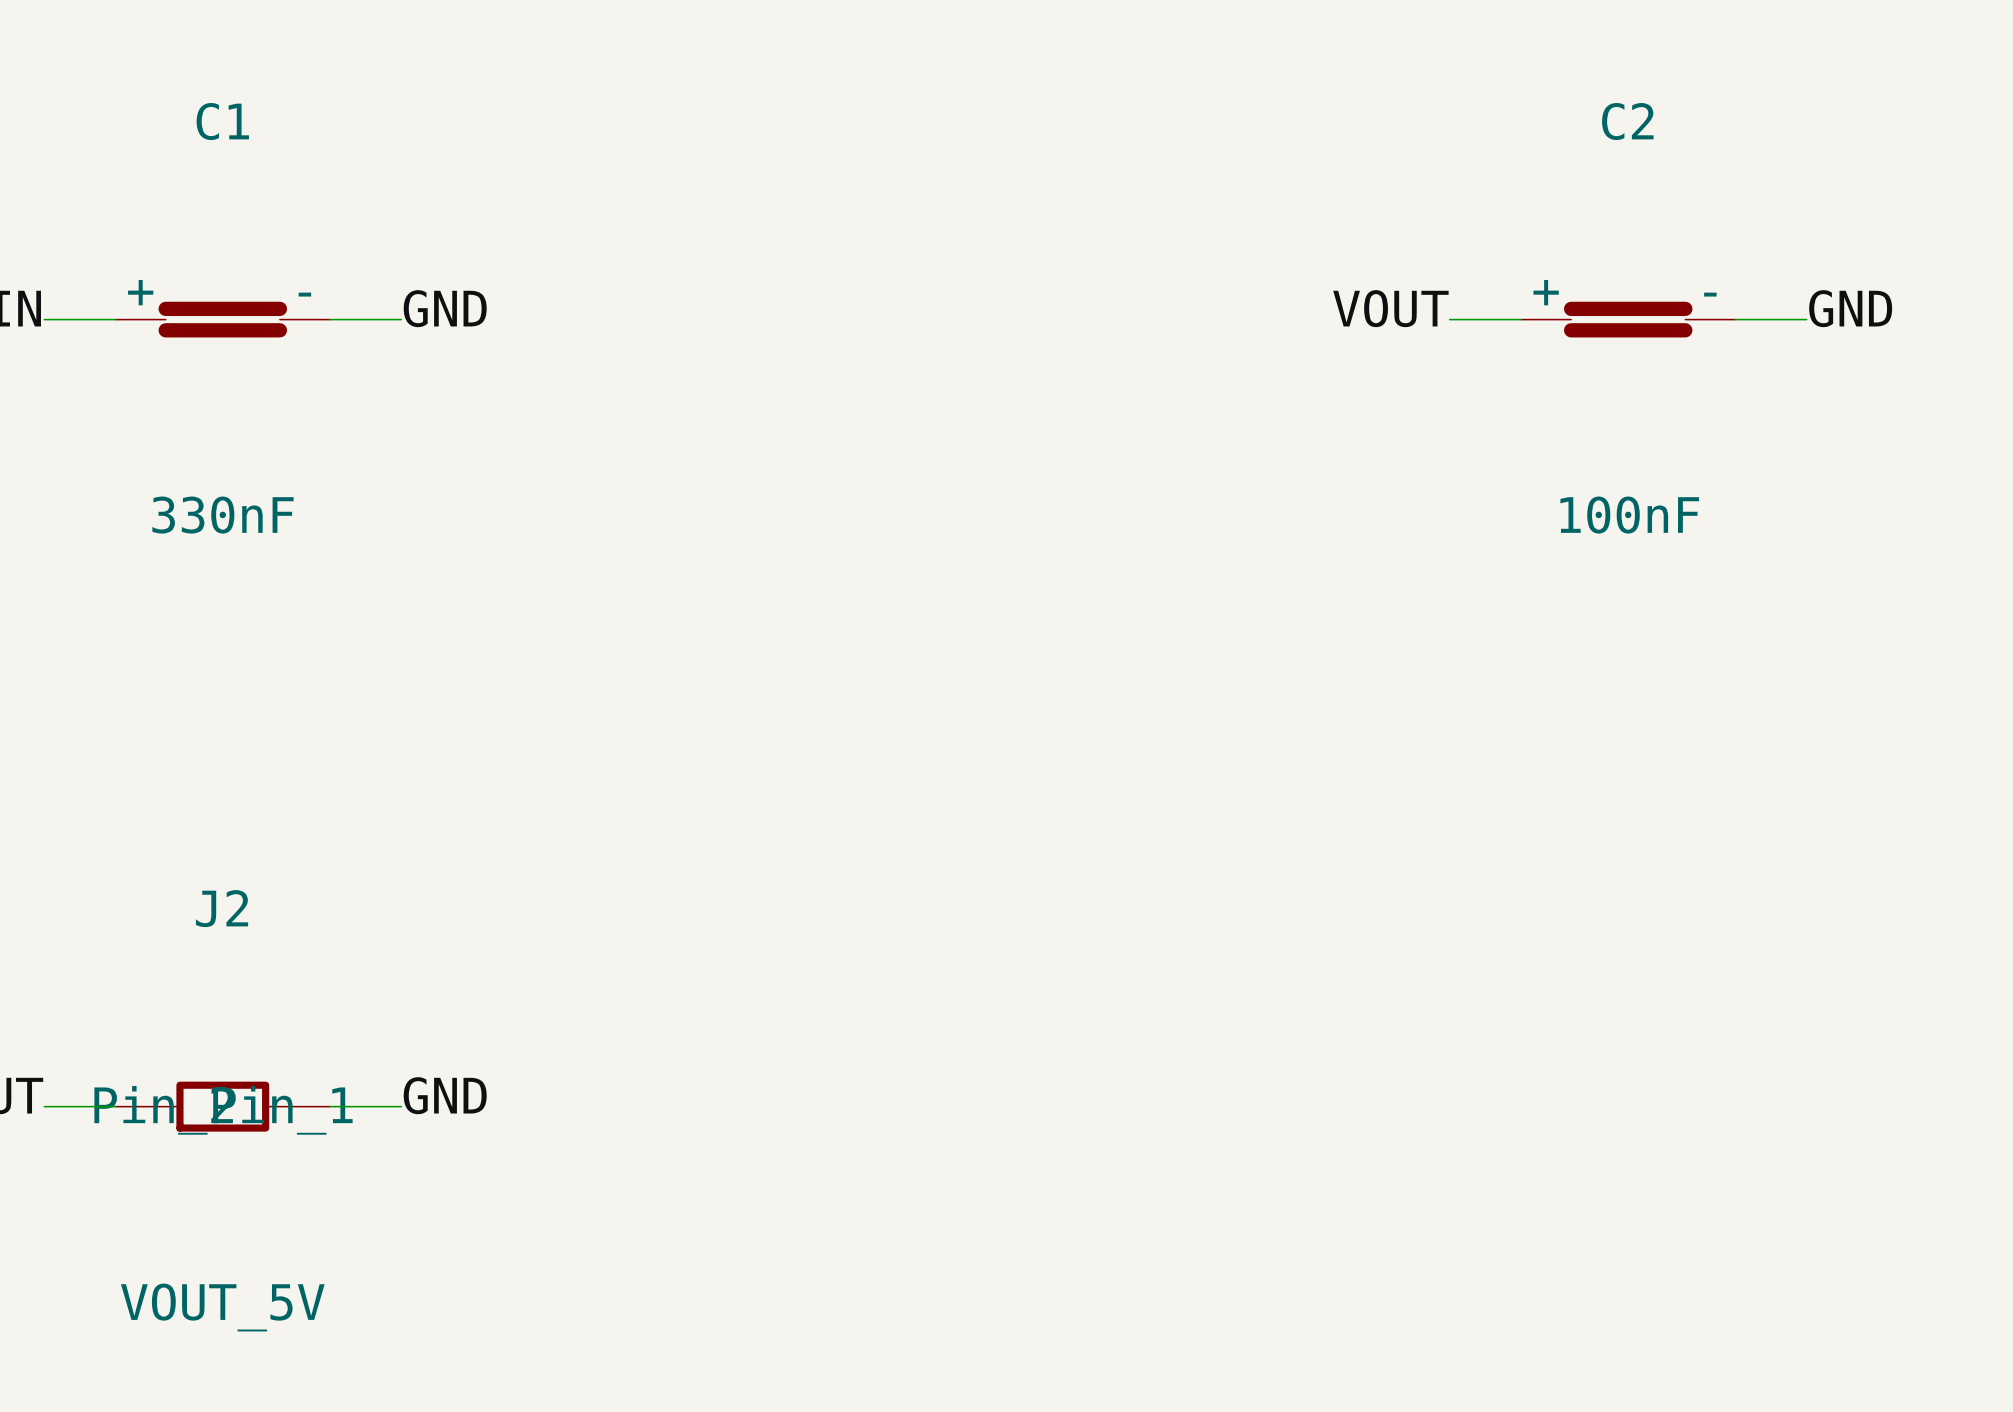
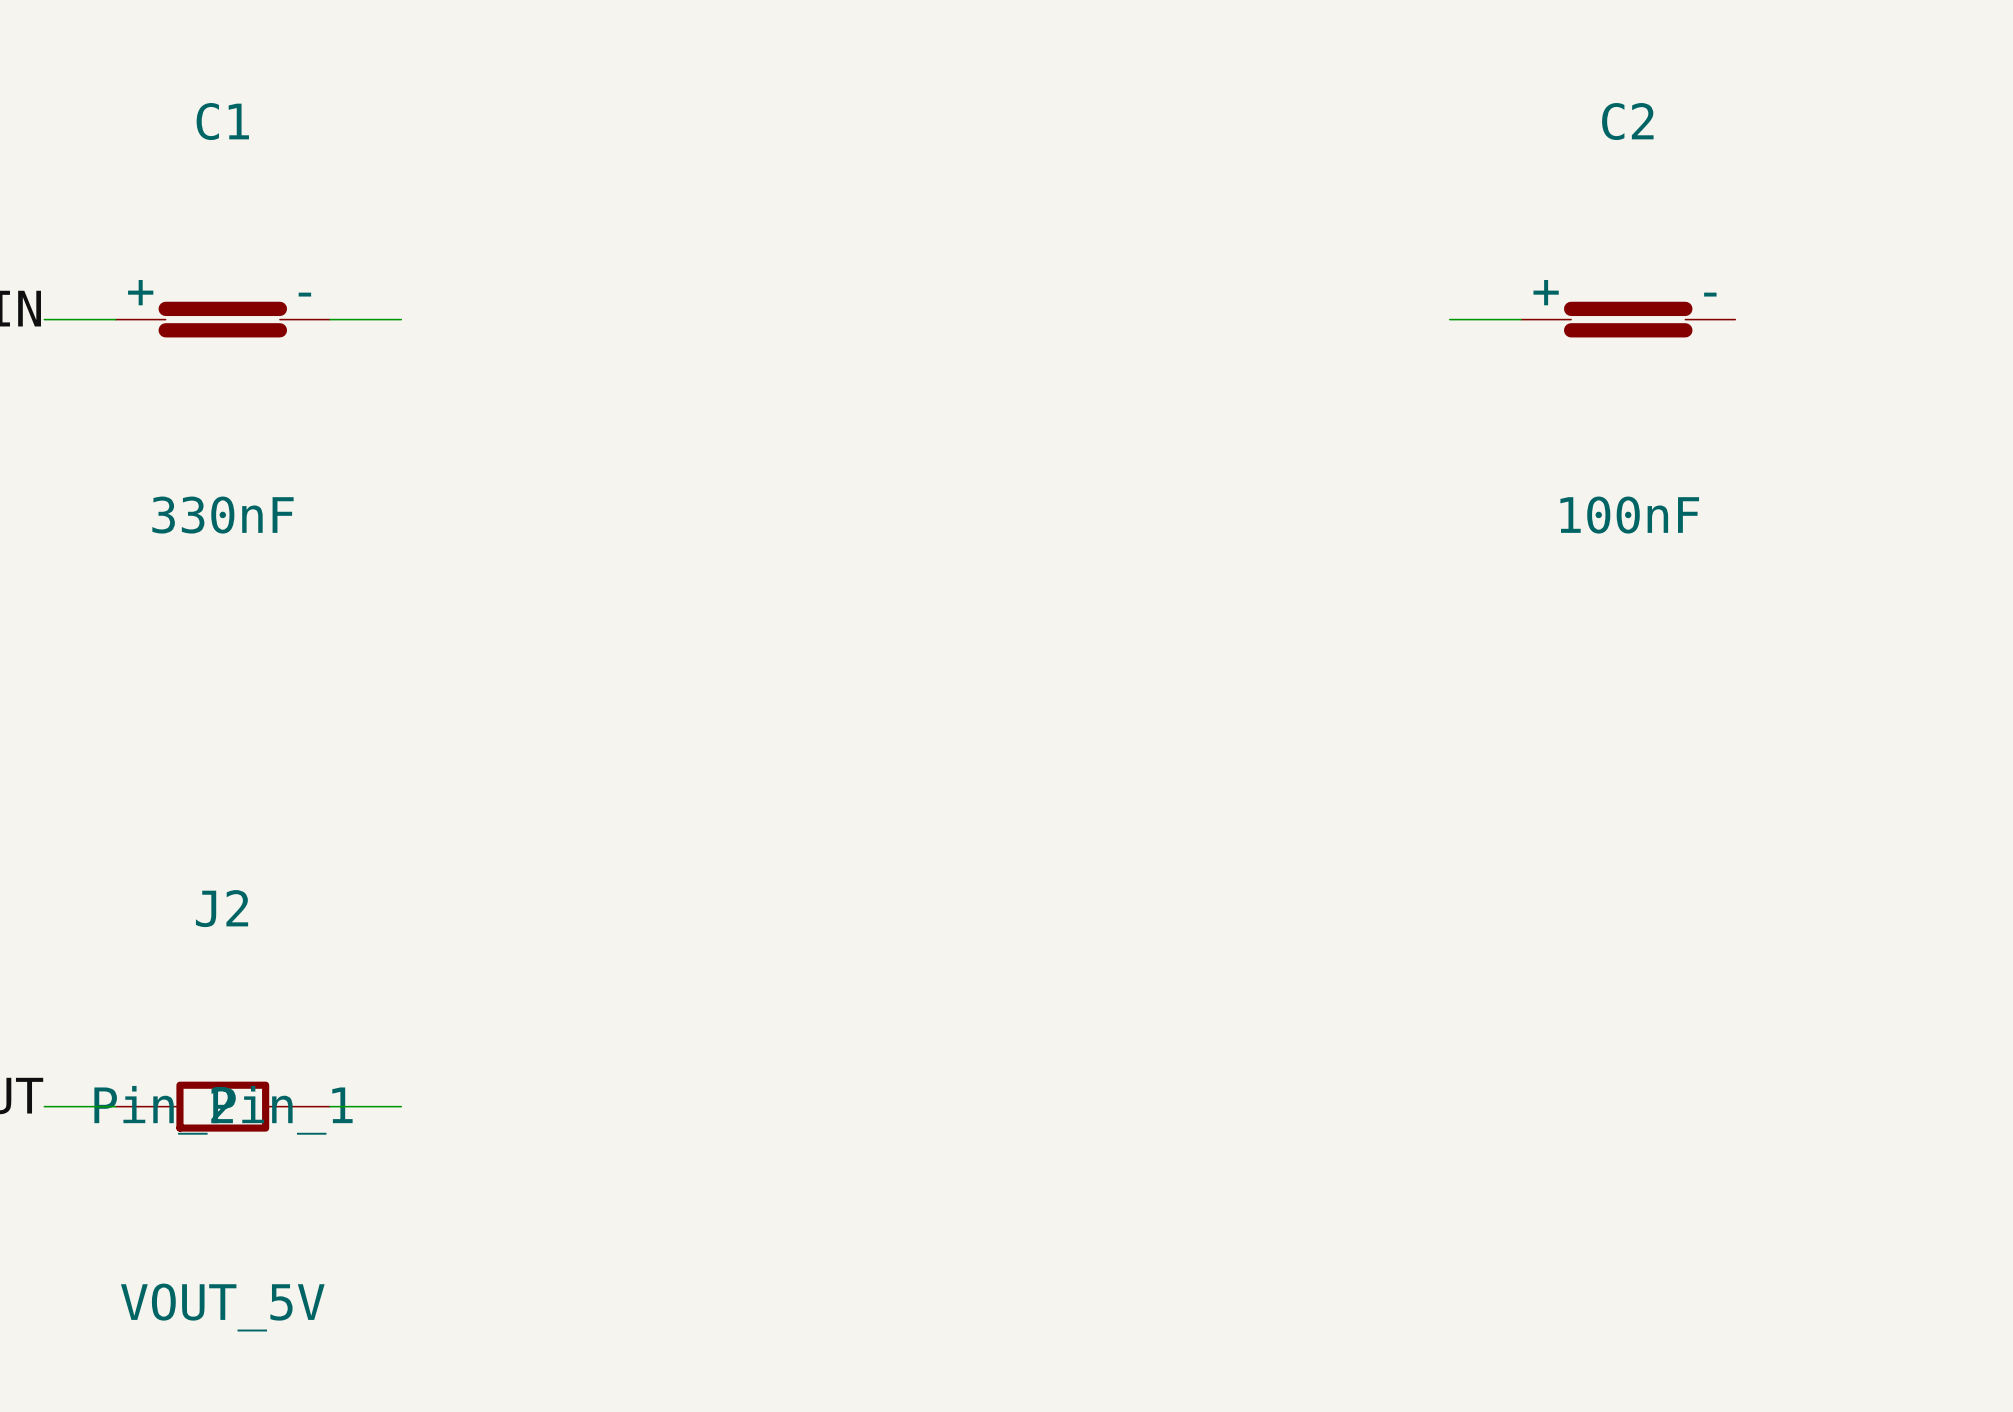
label: GND (445, 308) -> none
label: VOUT (1390, 308) -> none
label: GND (1850, 308) -> none
wire: (1735, 319) (1806, 319) -> none
label: GND (445, 1095) -> none

